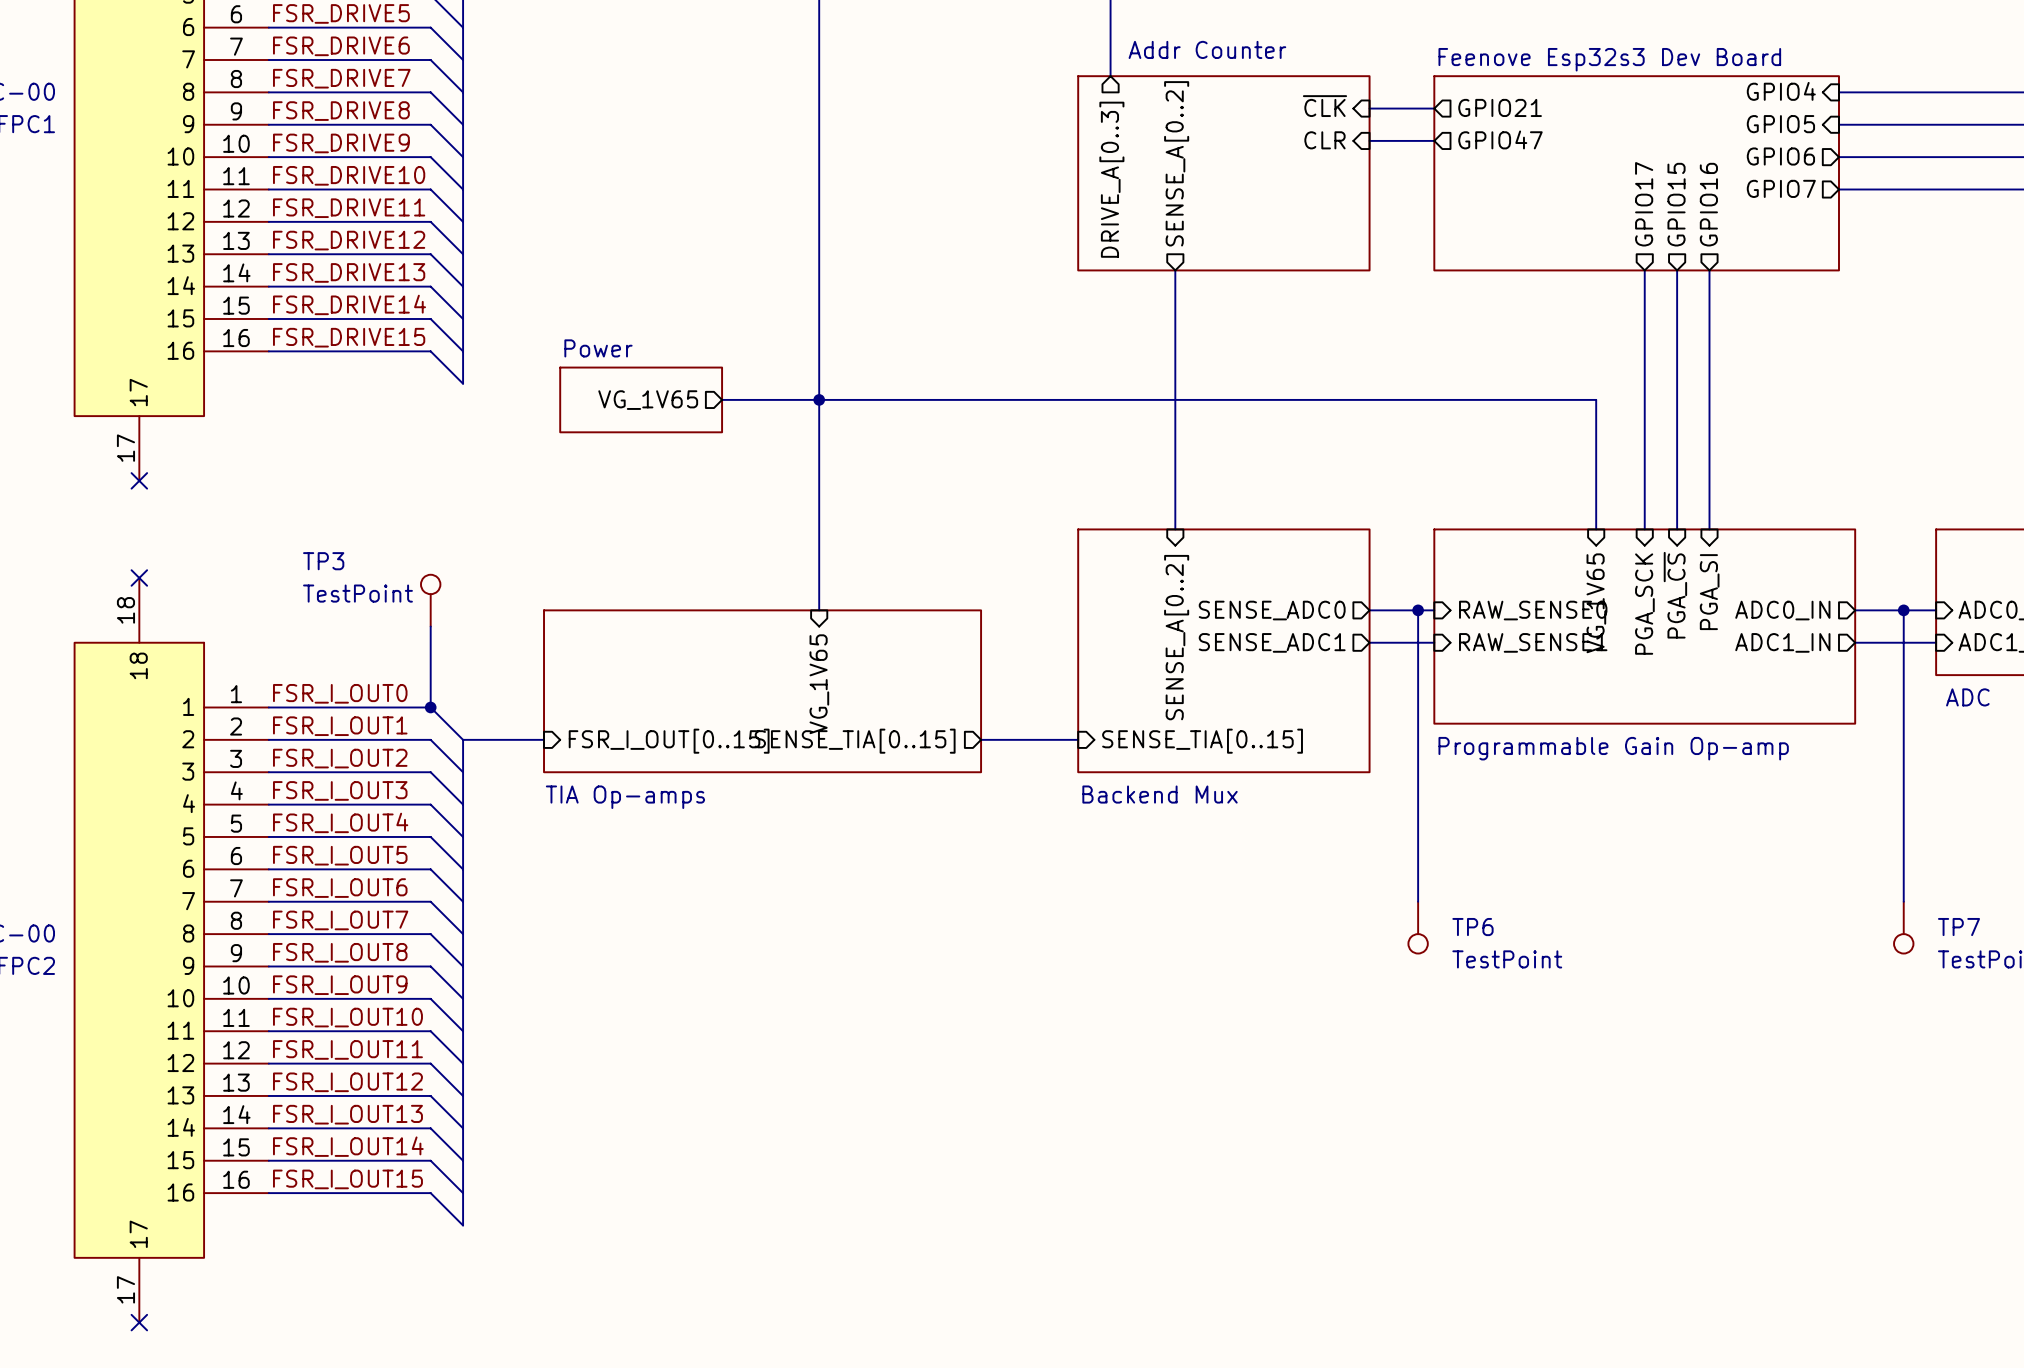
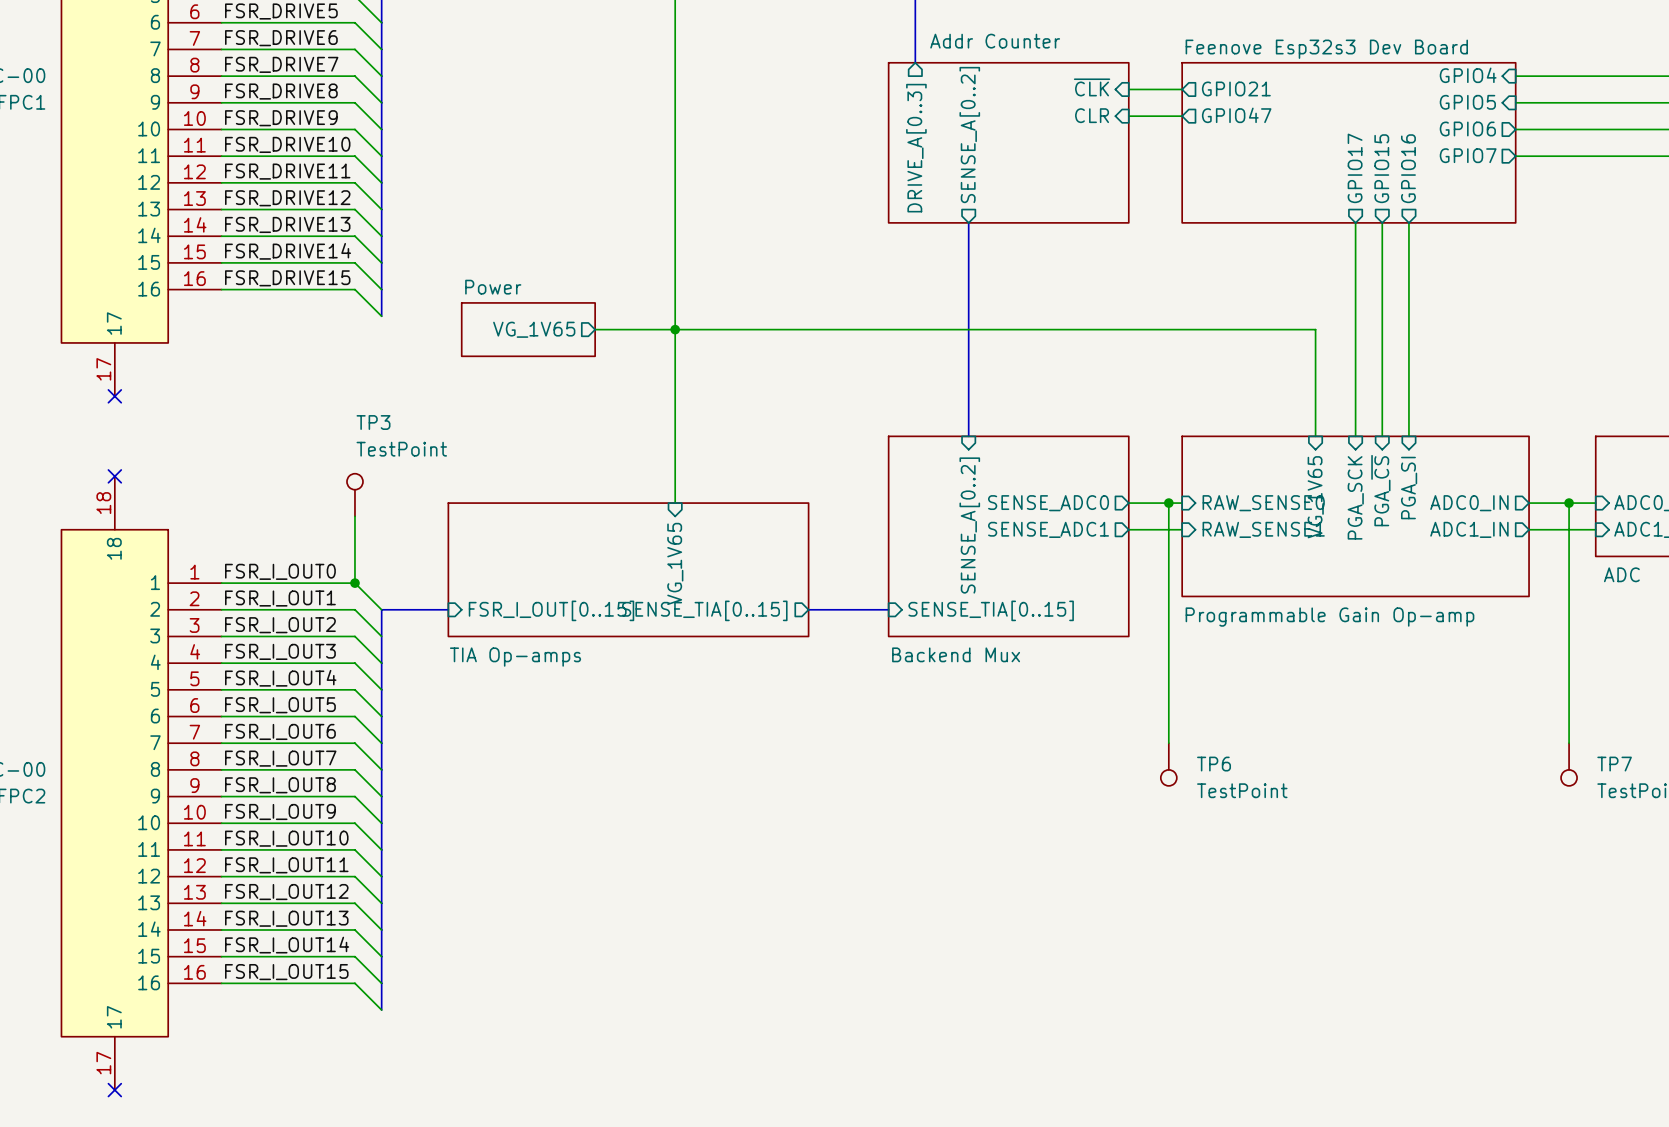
TP3 name position: TP3 (323, 561) -> TP3 (373, 422)
TP3 value position: TestPoint (357, 593) -> TestPoint (401, 449)

